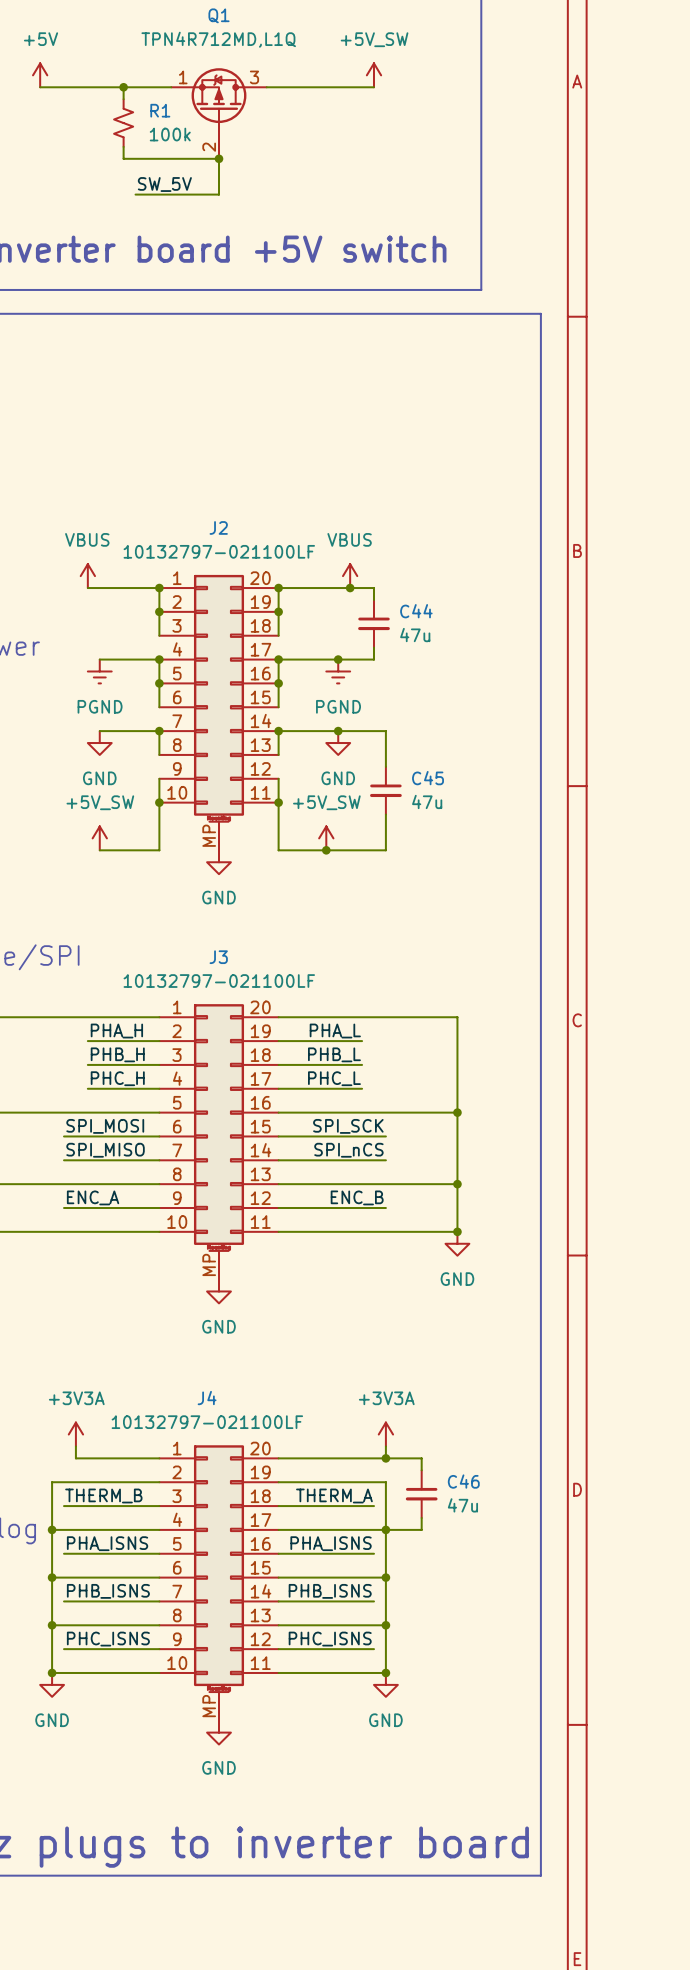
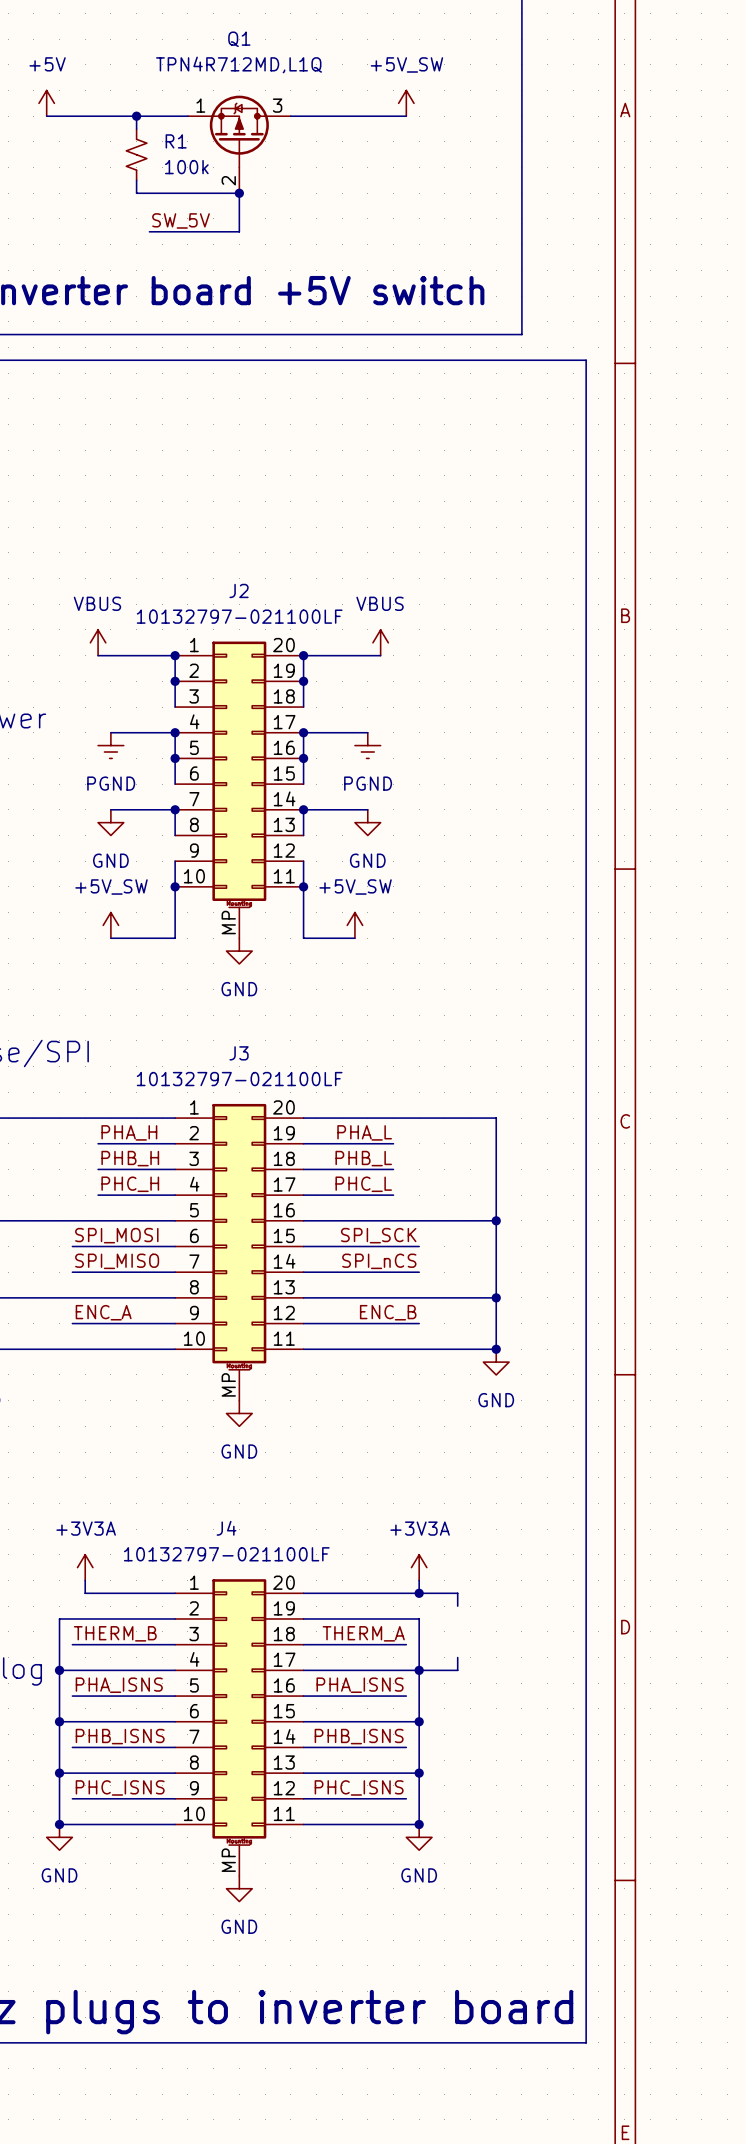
wire: (350, 588) (373, 588) (373, 599) -> none
junction: (350, 588) -> none
C44: 47u (373, 623) -> none
wire: (373, 647) (373, 659) (338, 659) -> none
junction: (338, 659) -> none
wire: (338, 731) (385, 731) (385, 766) -> none
junction: (338, 731) -> none
C45: 47u (385, 790) -> none
wire: (385, 814) (385, 850) (326, 850) -> none
junction: (326, 850) -> none
C46: 47u (421, 1494) -> none

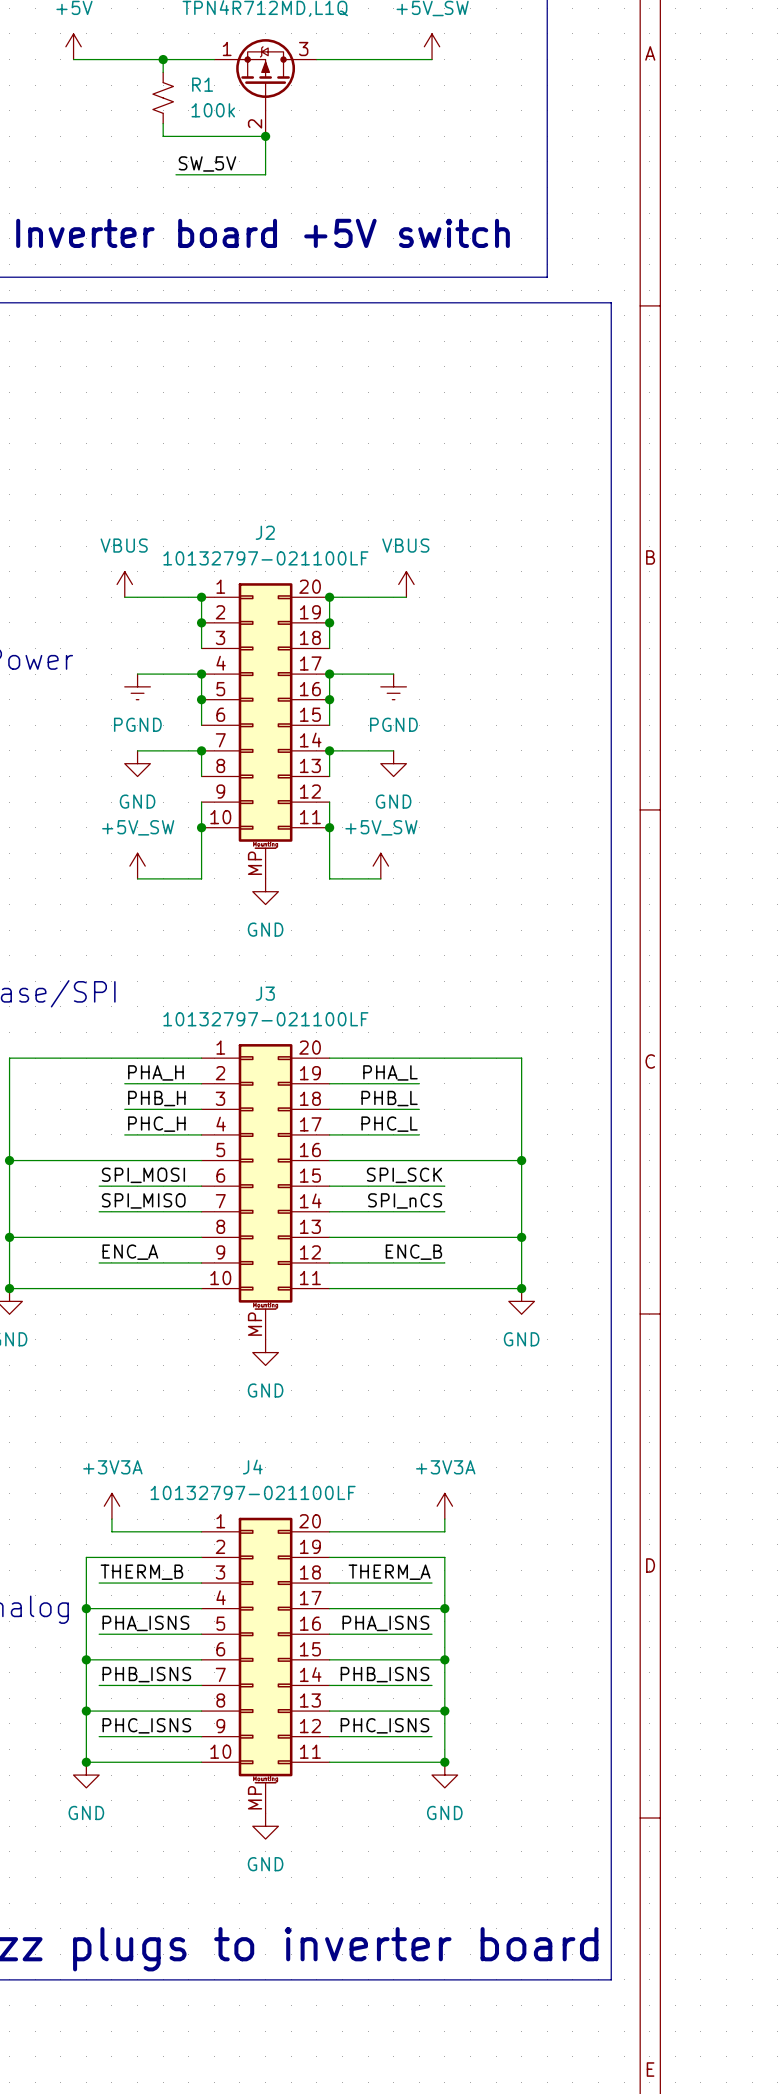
wire: (419, 1593) (457, 1593) (457, 1606) -> none
junction: (419, 1593) -> none
wire: (457, 1657) (457, 1670) (419, 1670) -> none

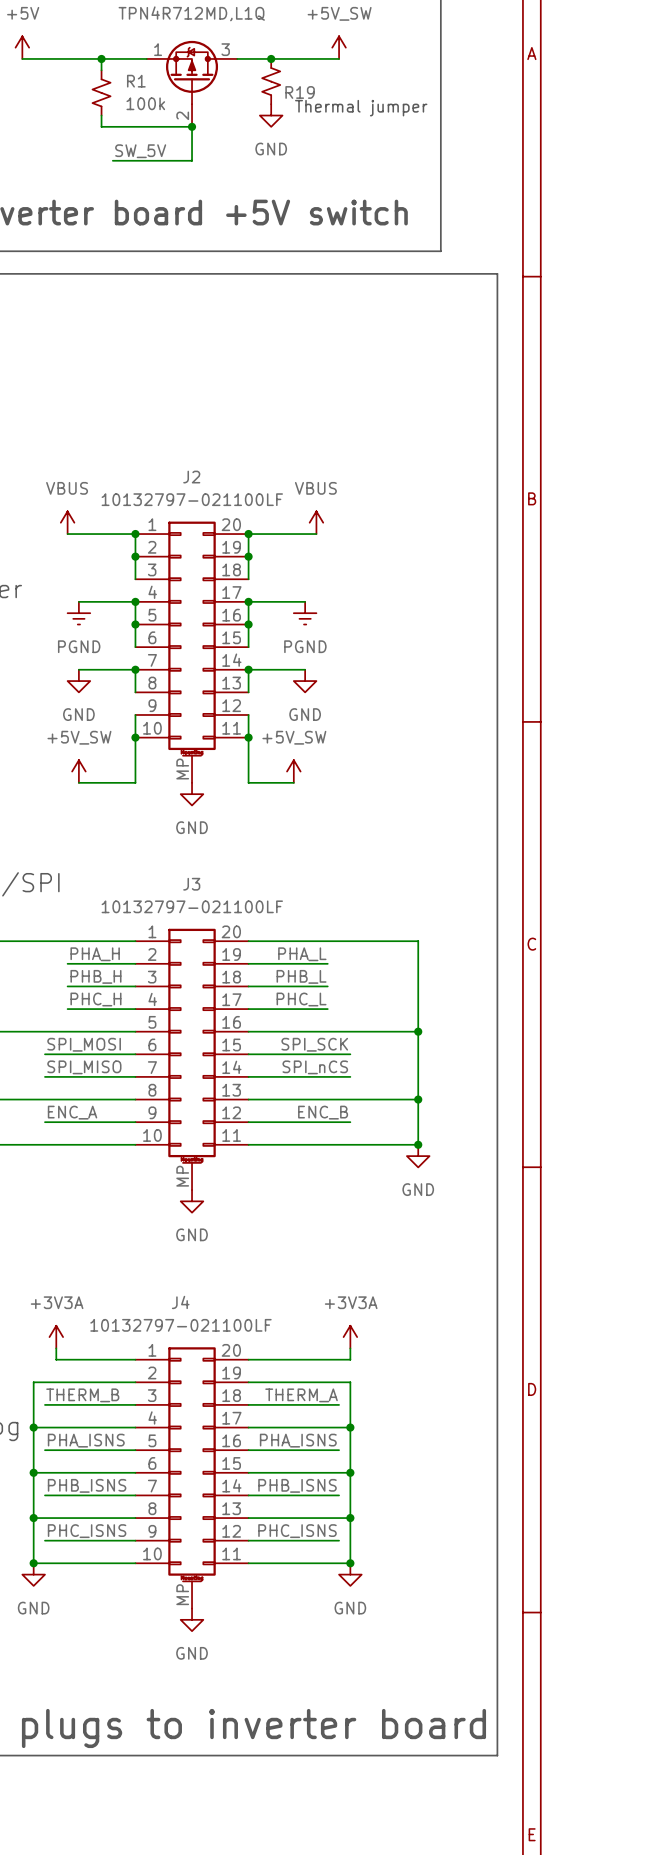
junction: none -> (271, 58)
R19: none -> (271, 81)
text: none -> Thermal jumper (361, 108)
power symbol: none -> GND (271, 115)

